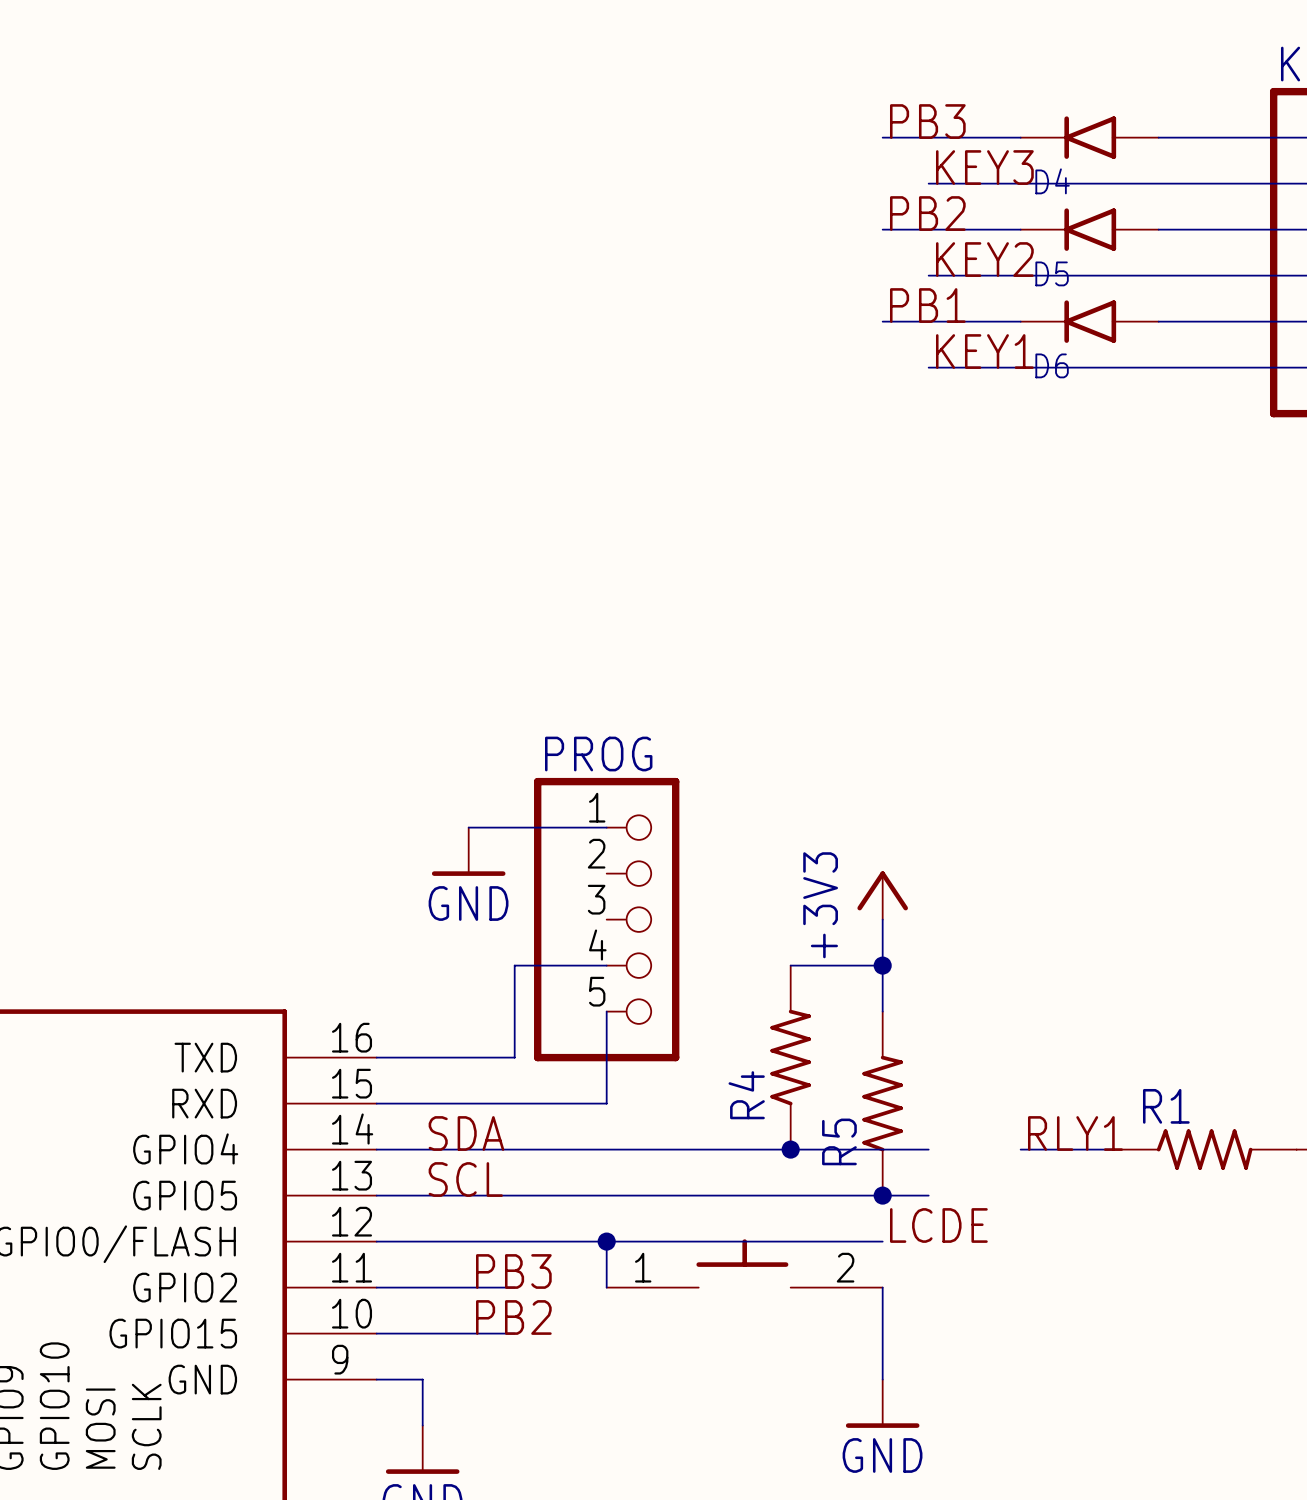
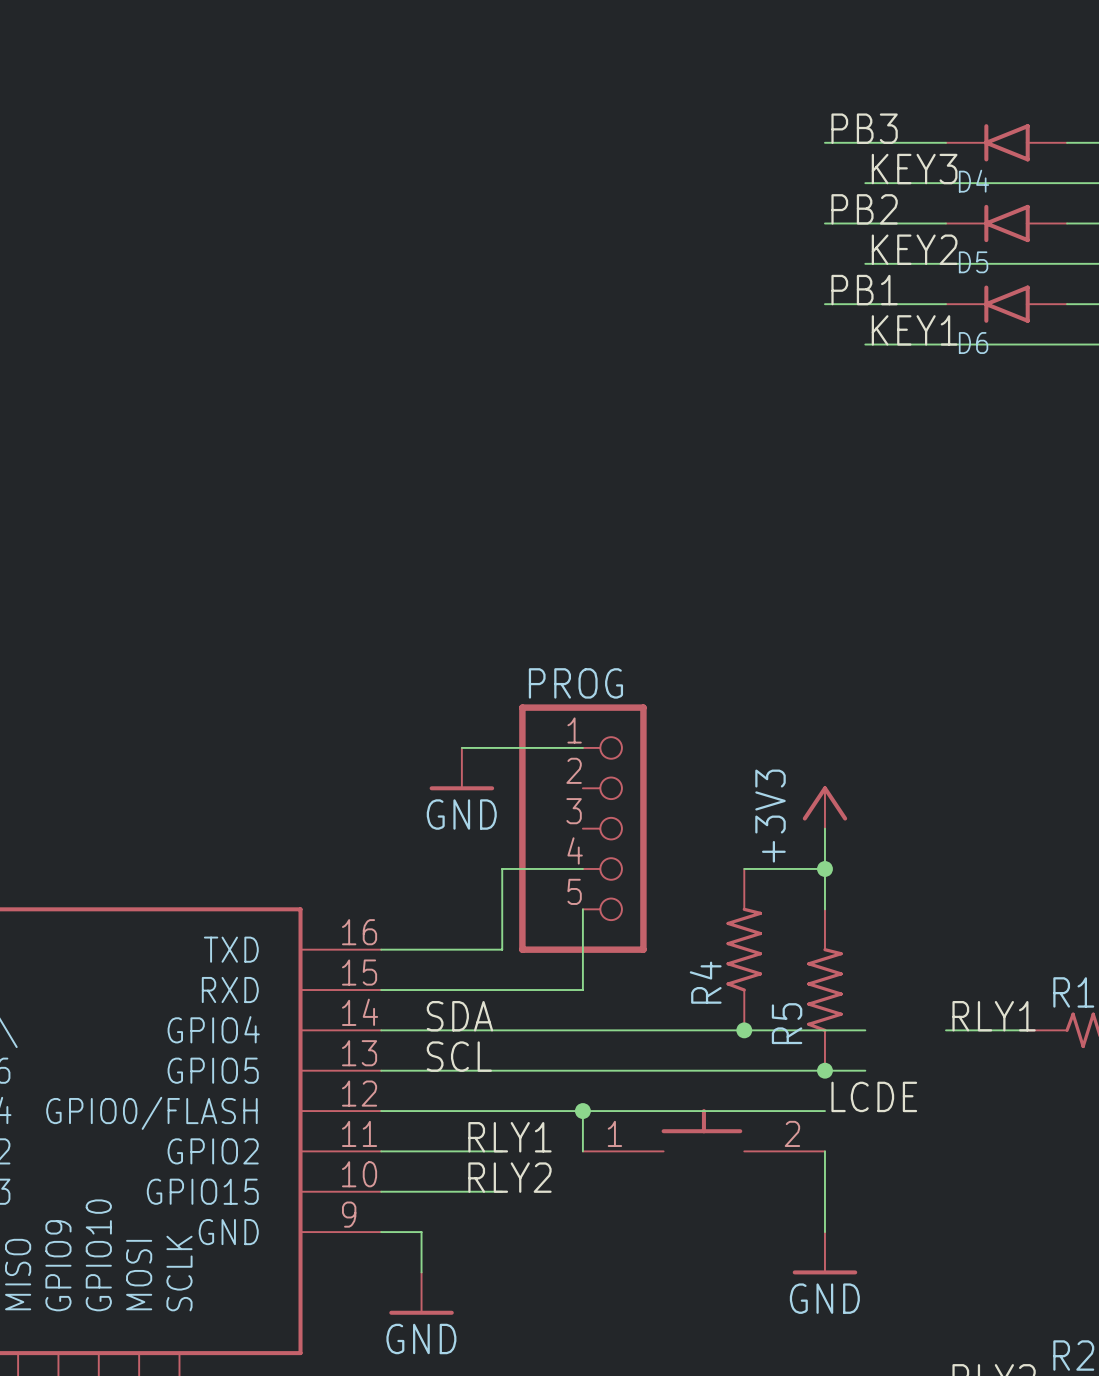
label: PB3 (513, 1271) -> RLY1 (509, 1137)
label: PB2 (513, 1317) -> RLY2 (509, 1177)

